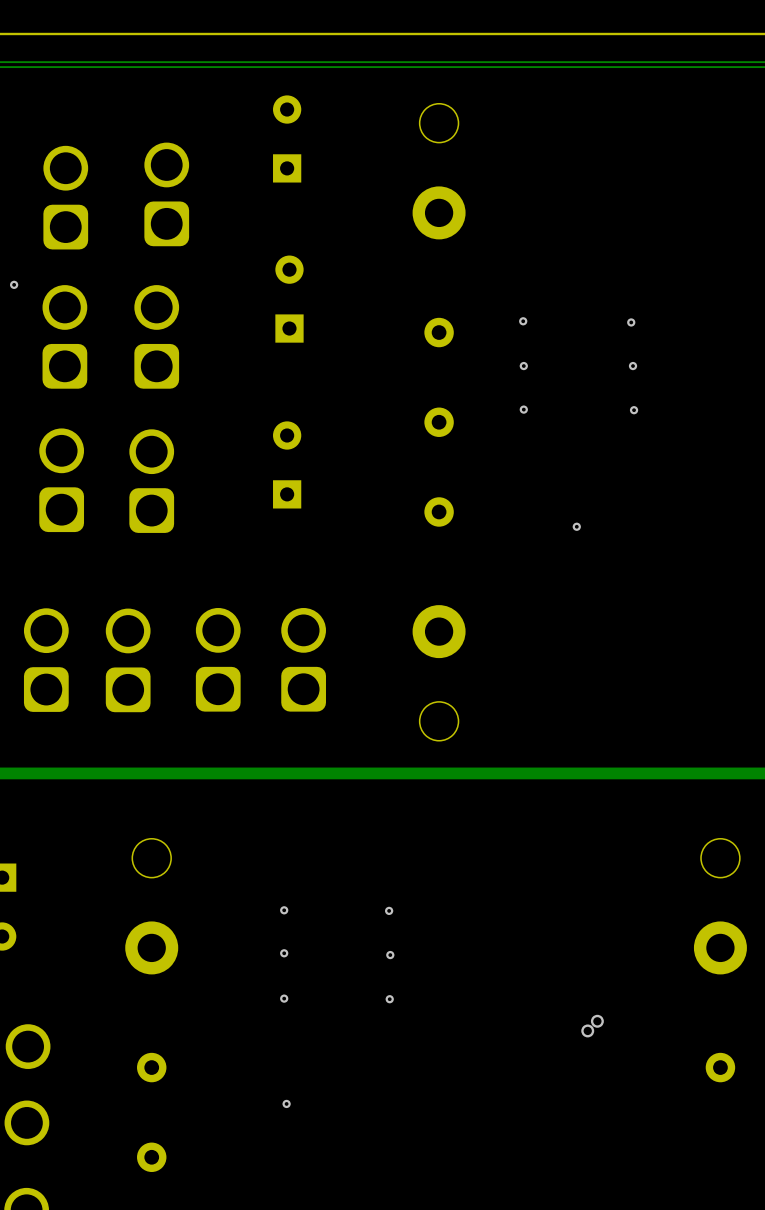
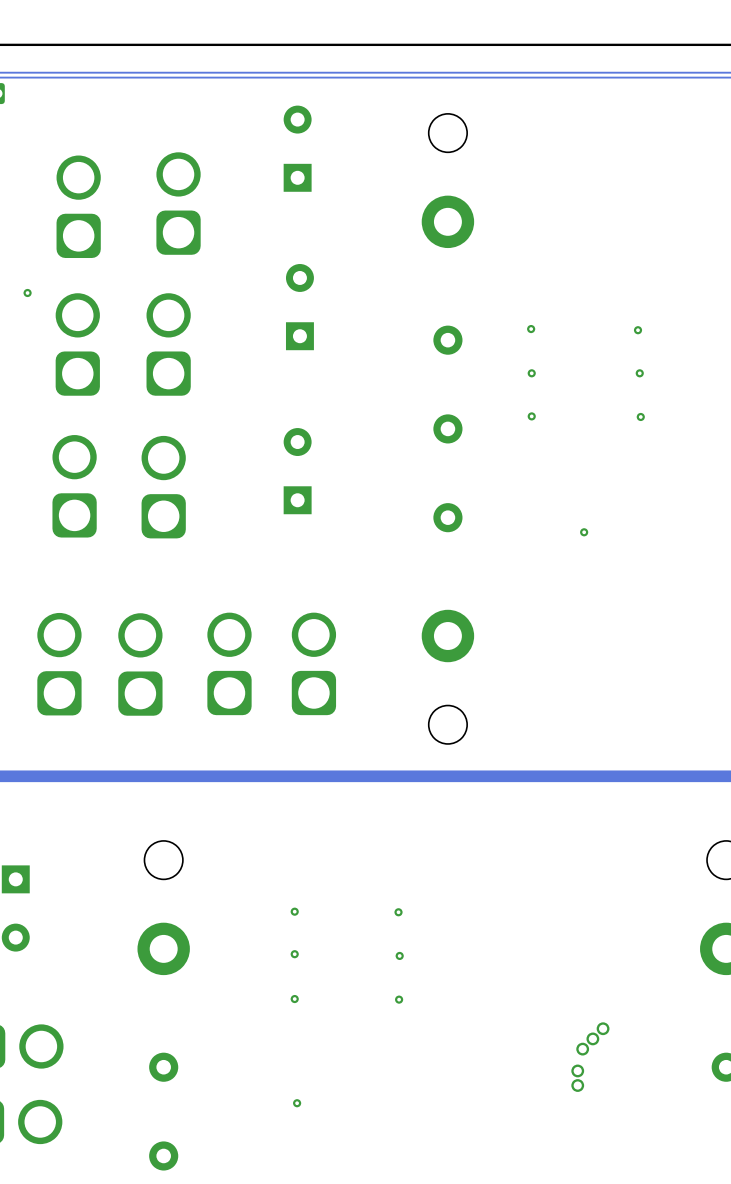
via: (597, 1021) -> none
via: none -> (603, 1028)
via: (587, 1030) -> none
via: none -> (592, 1038)
via: none -> (582, 1049)
via: none -> (577, 1070)
via: none -> (577, 1085)

